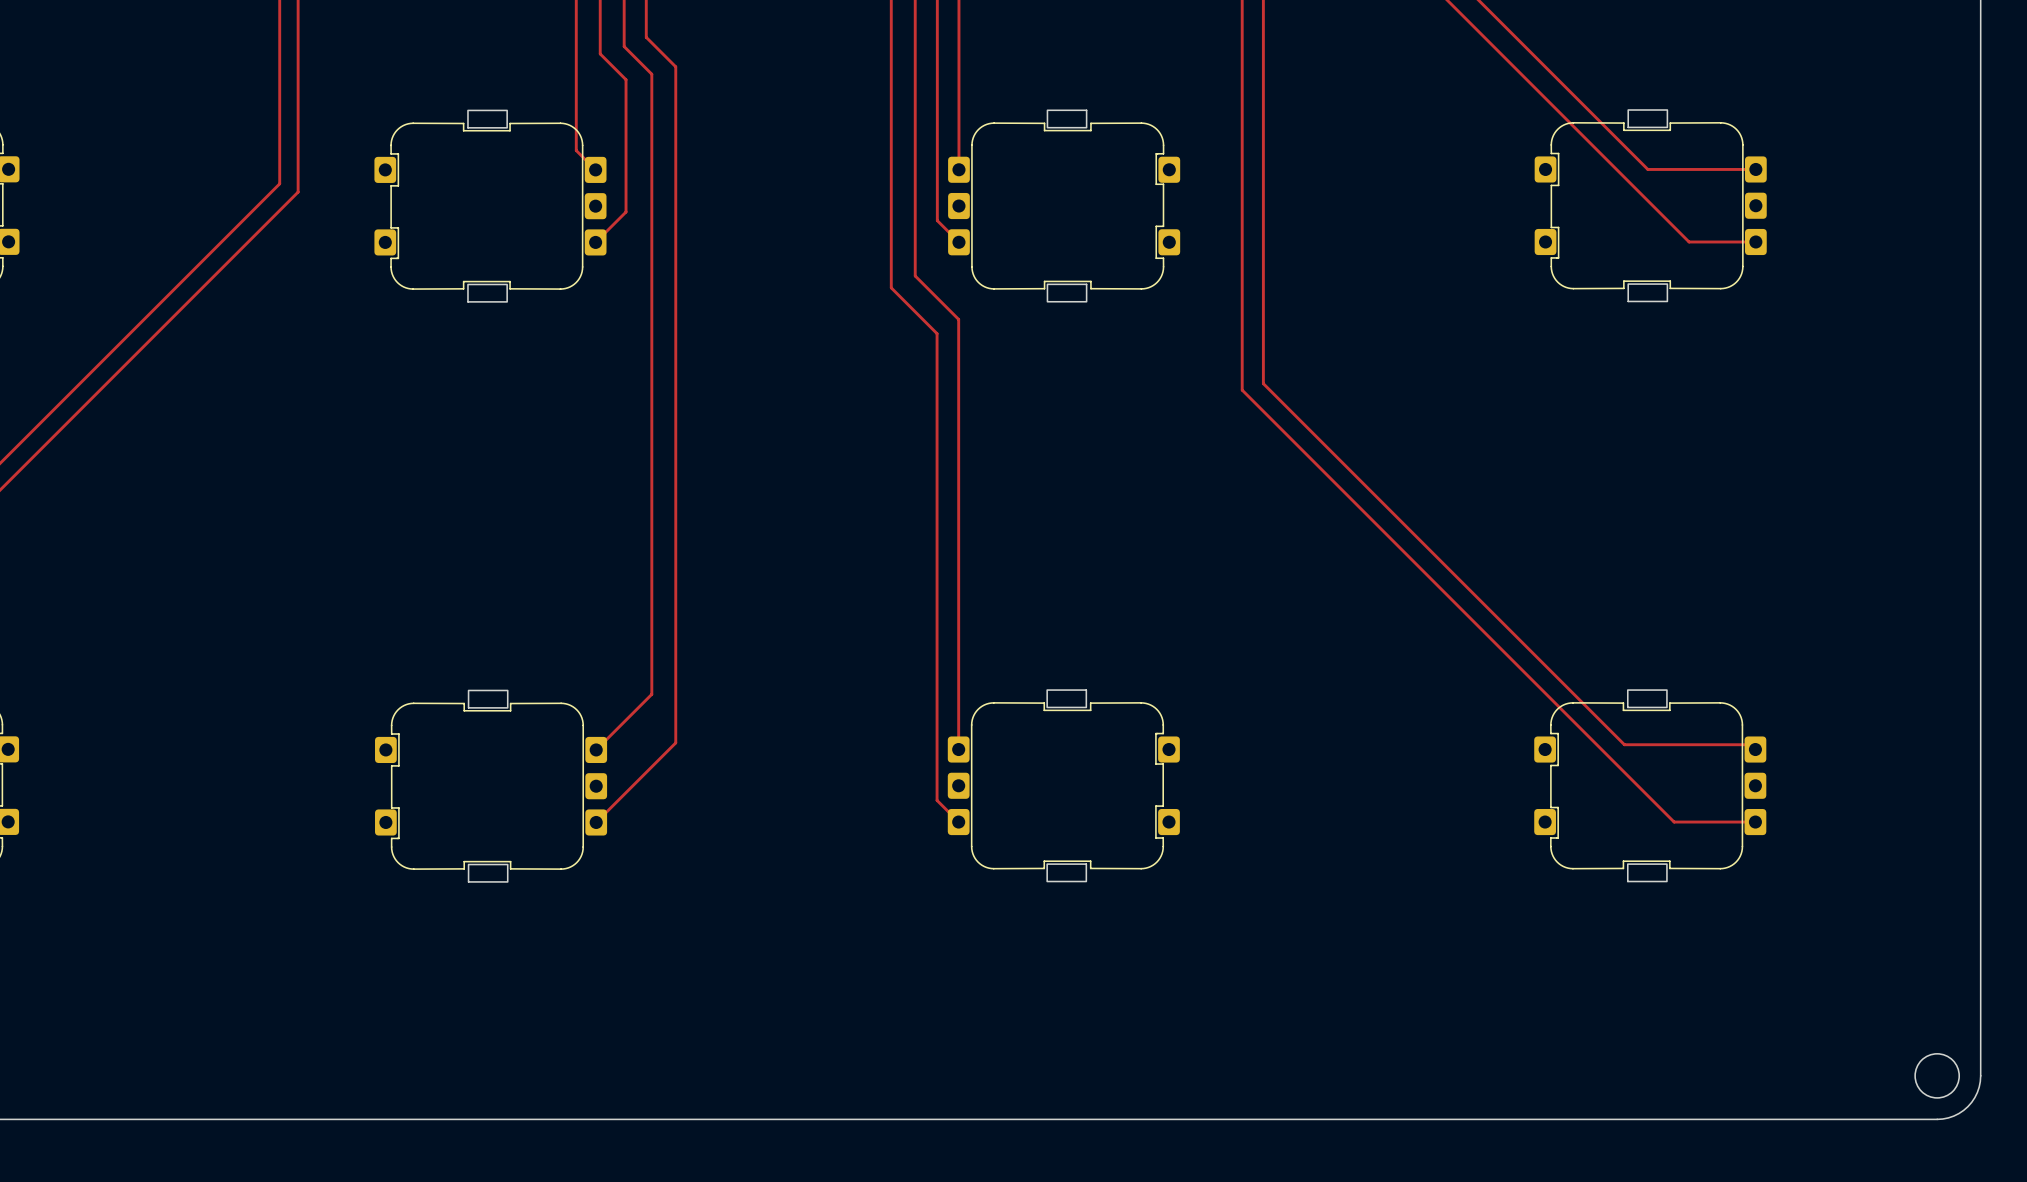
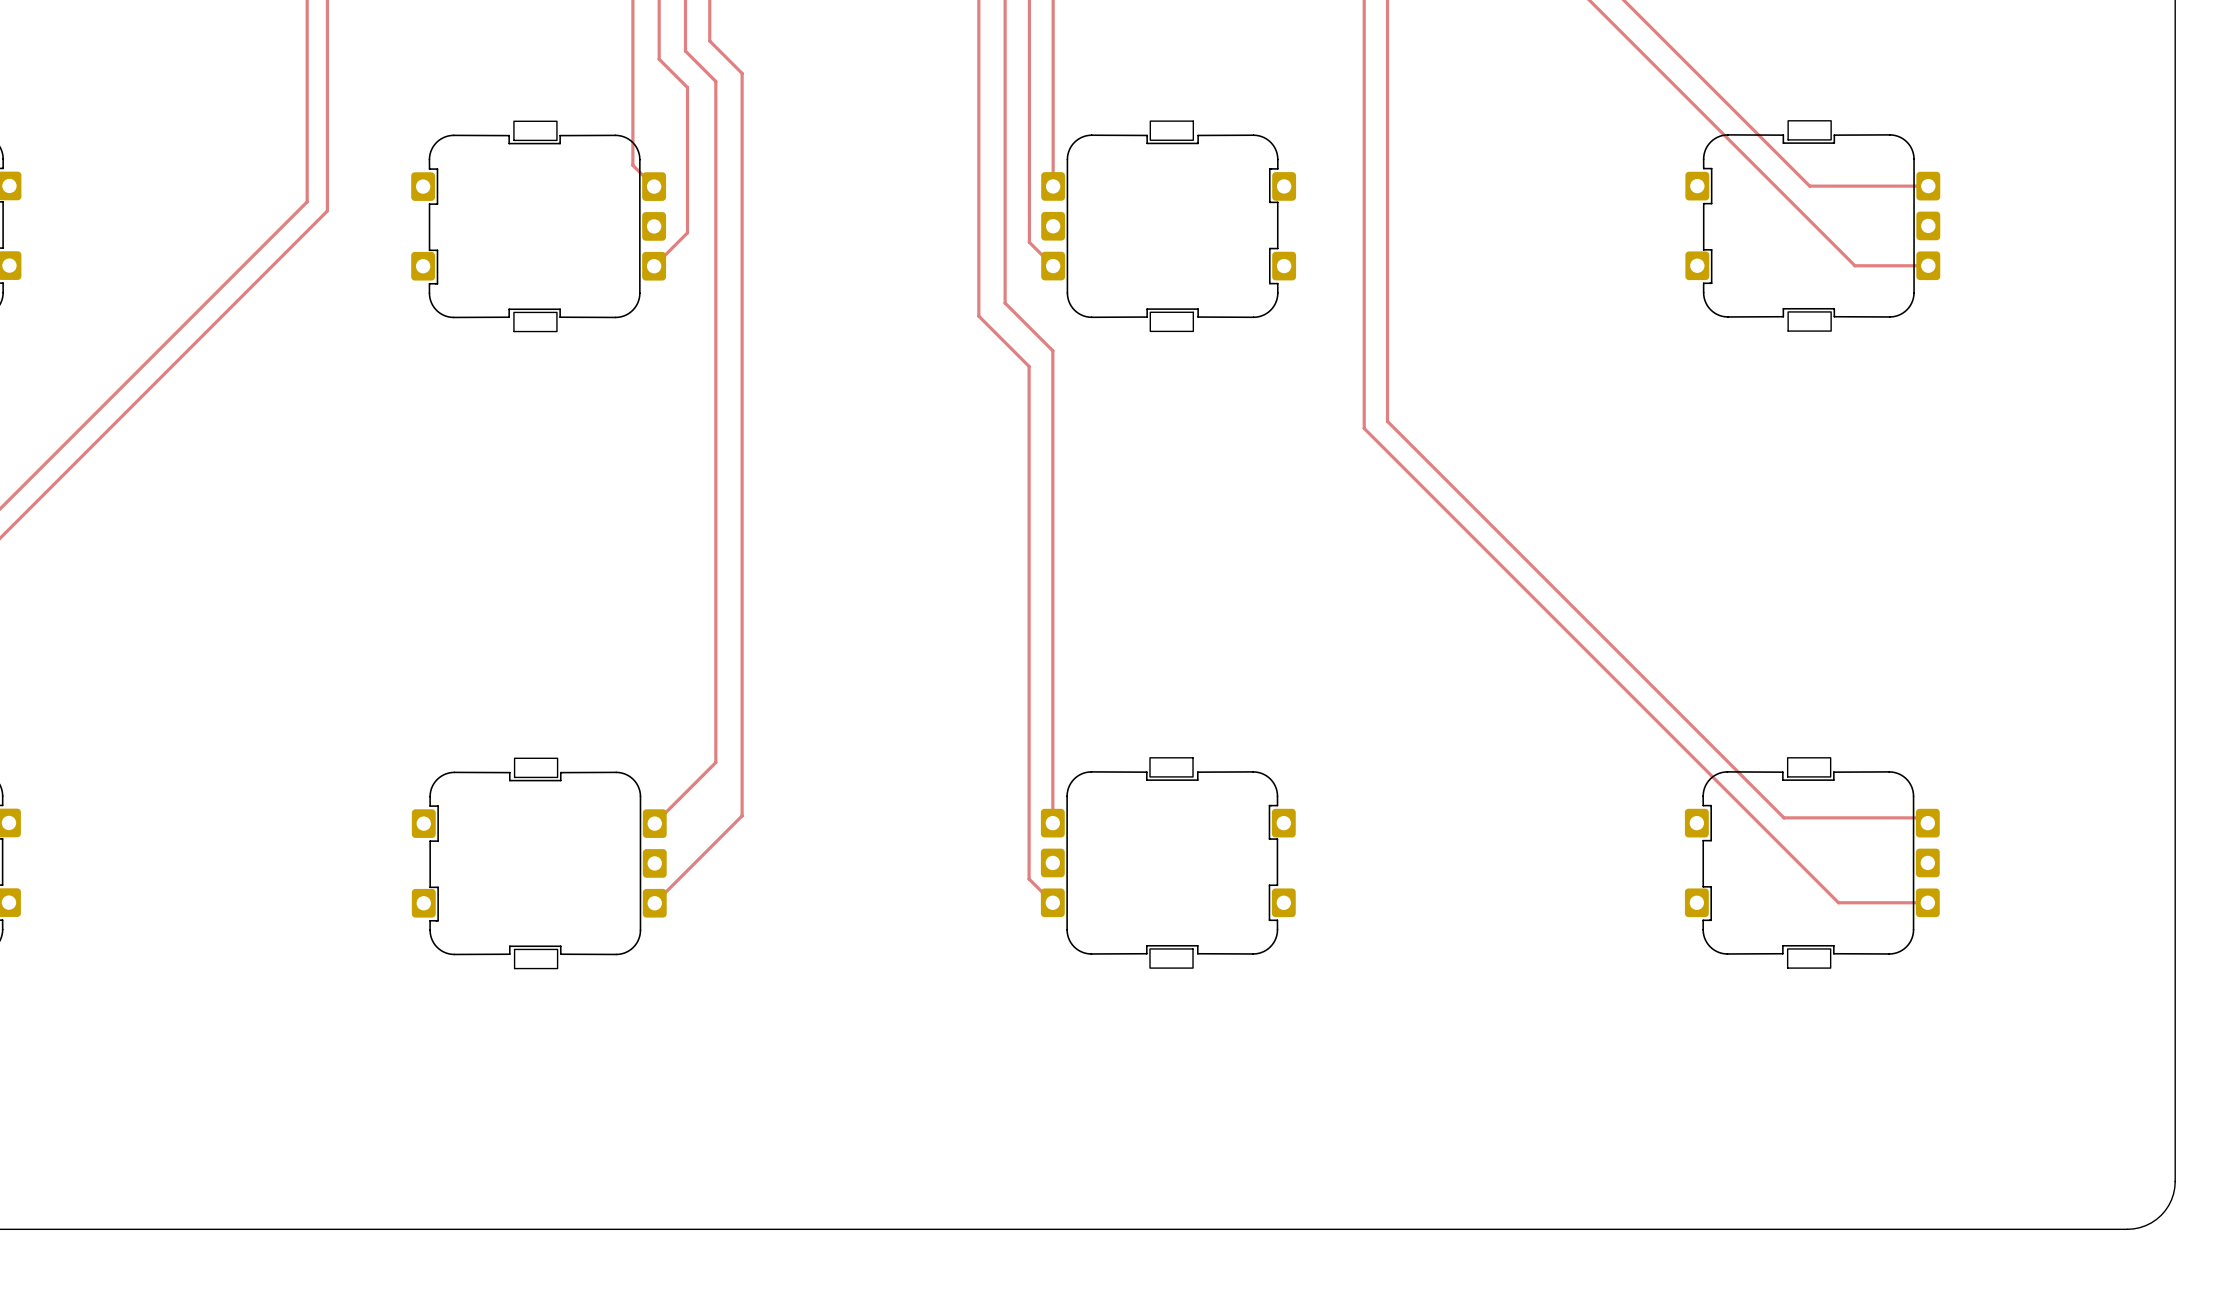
round board edge: [1914, 1053, 1960, 1099] -> none

